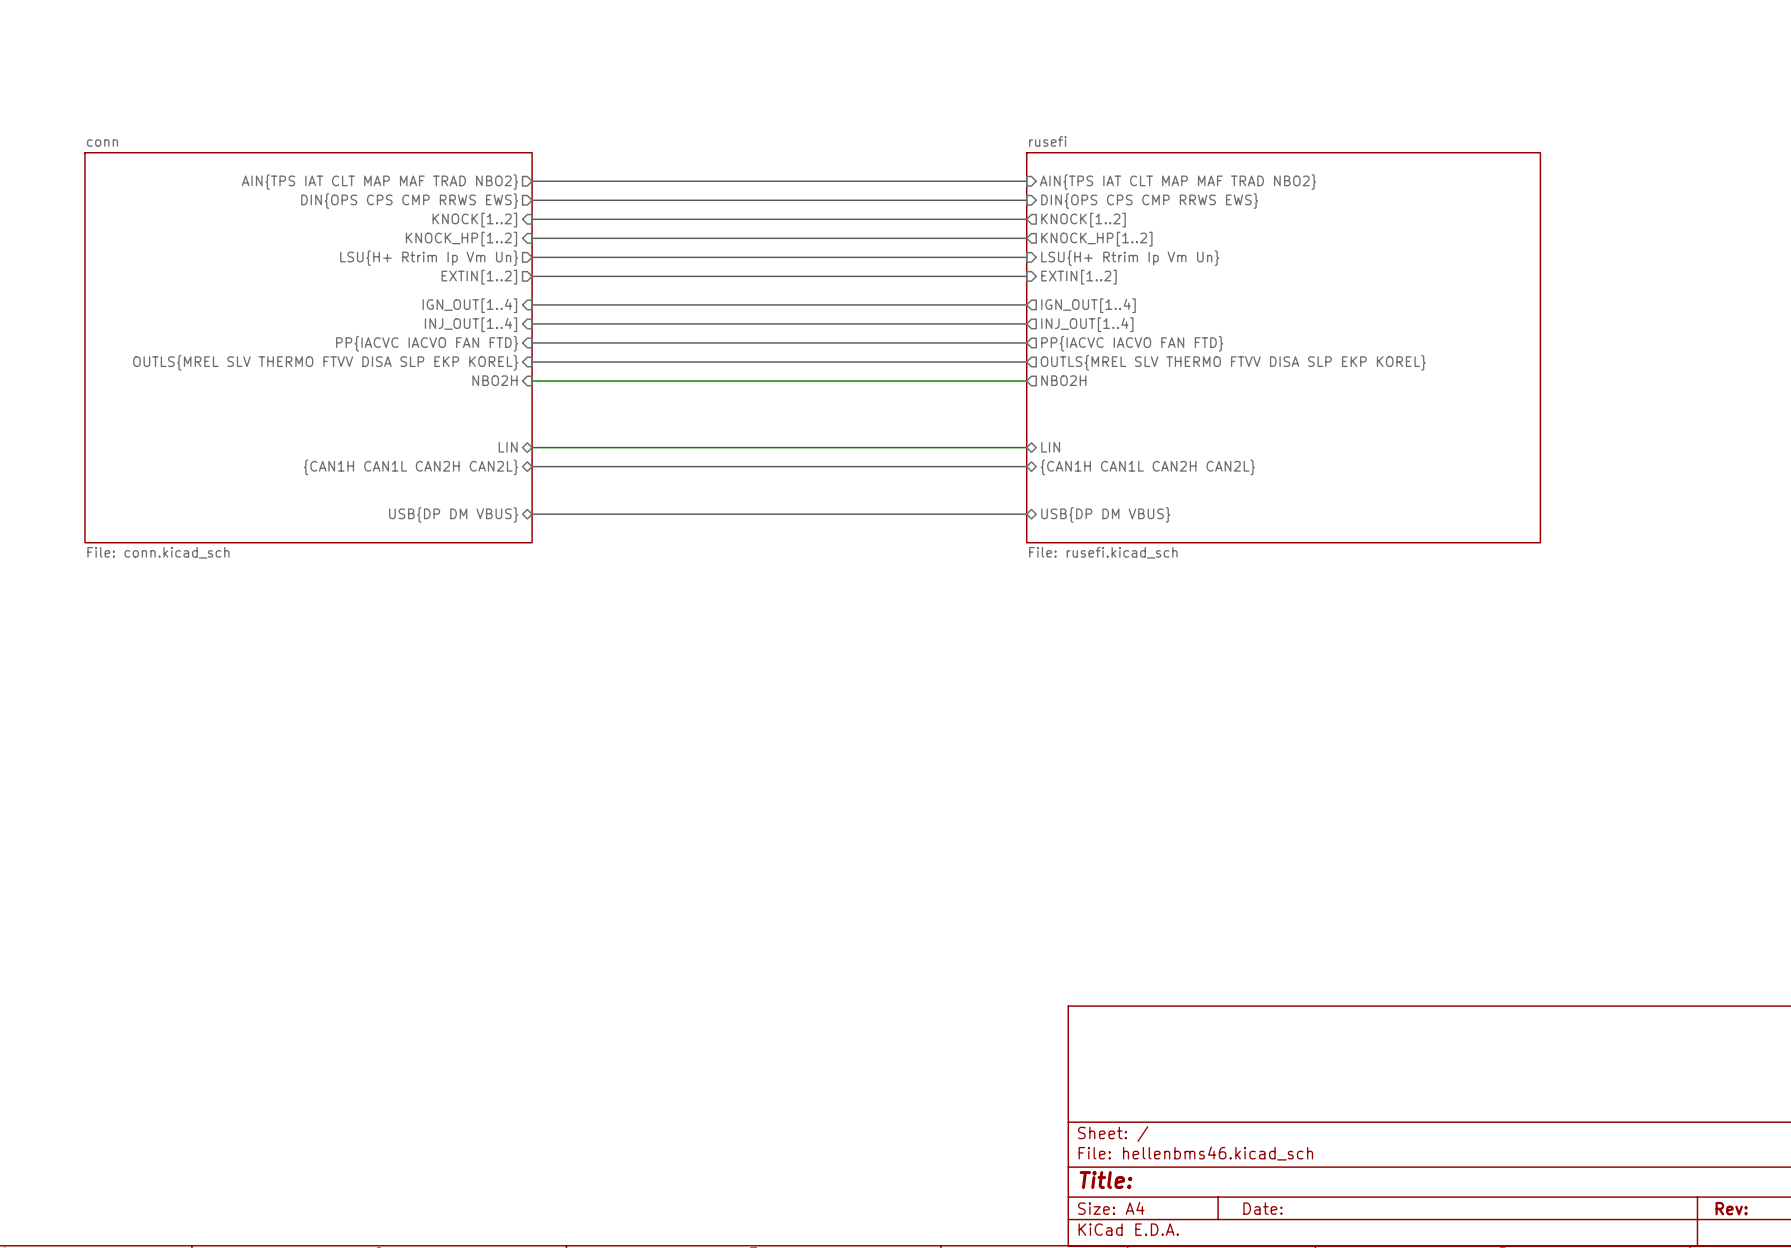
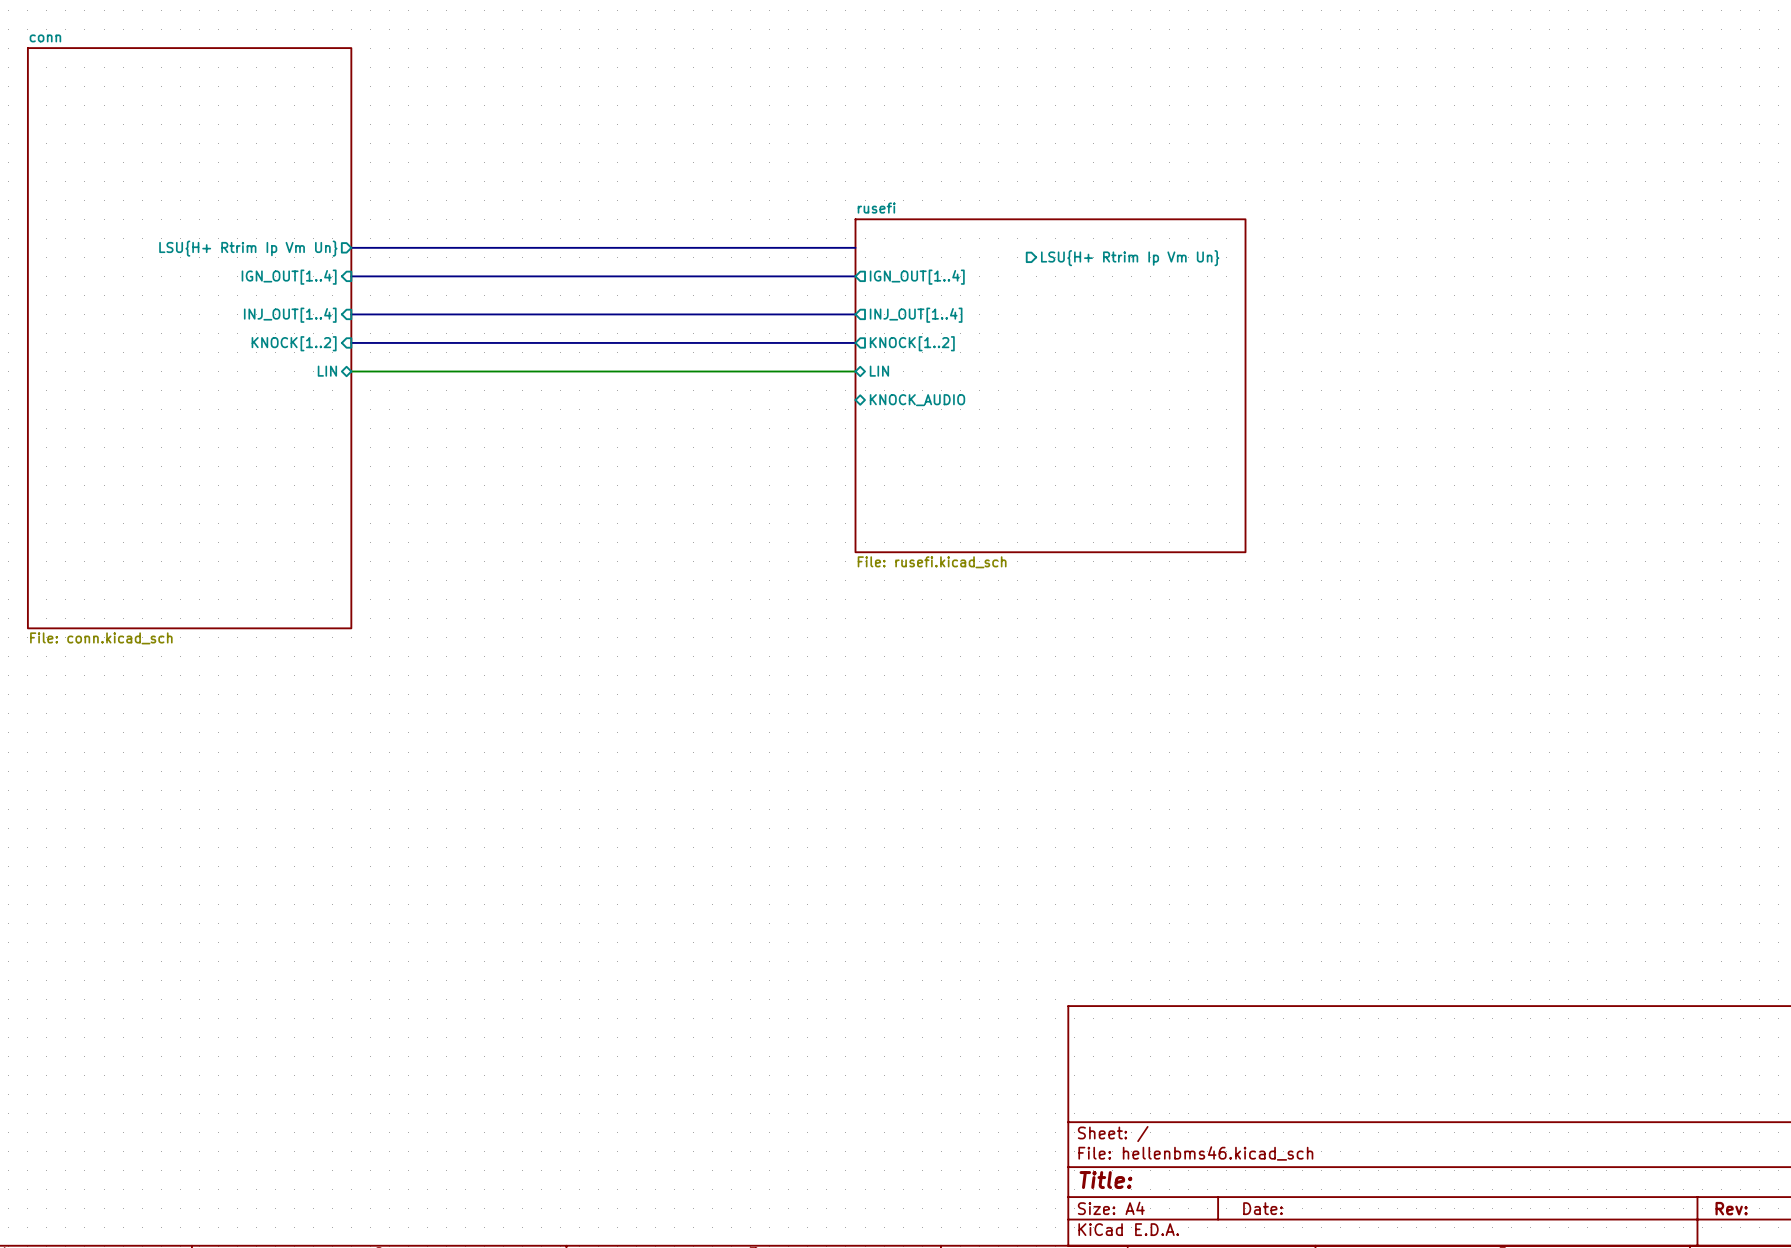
bus: (532, 181) (1026, 181) -> none
sheet pin: AIN{TPS IAT CLT MAP MAF TRAD NBO2} (379, 182) -> none
sheet pin: AIN{TPS IAT CLT MAP MAF TRAD NBO2} (1177, 182) -> none
bus: (532, 200) (1026, 200) -> none
sheet pin: DIN{OPS CPS CMP RRWS EWS} (409, 201) -> none
sheet pin: DIN{OPS CPS CMP RRWS EWS} (1149, 201) -> none
bus: (532, 219) (1026, 219) -> none
sheet pin: KNOCK[1..2] (474, 220) -> none
sheet pin: KNOCK[1..2] (1083, 220) -> none
bus: (532, 238) (1026, 238) -> none
sheet pin: KNOCK_HP[1..2] (461, 239) -> none
sheet pin: KNOCK_HP[1..2] (1096, 239) -> none
bus: none -> (351, 247) (855, 247)
bus: (532, 257) (1026, 257) -> none
sheet pin position: LSU{H+ Rtrim Ip Vm Un} (429, 258) -> LSU{H+ Rtrim Ip Vm Un} (248, 248)
bus: none -> (351, 276) (532, 276)
bus: (855, 276) (1026, 276) -> none
sheet pin: none -> IGN_OUT[1..4] (289, 277)
sheet pin: EXTIN[1..2] (479, 277) -> none
sheet pin: EXTIN[1..2] (1078, 277) -> none
bus: (532, 304) (1026, 304) -> none
sheet pin: IGN_OUT[1..4] (469, 305) -> none
sheet pin position: IGN_OUT[1..4] (1088, 305) -> IGN_OUT[1..4] (917, 277)
bus: none -> (351, 314) (855, 314)
sheet pin: none -> INJ_OUT[1..4] (290, 315)
bus: (532, 323) (1026, 323) -> none
sheet pin: INJ_OUT[1..4] (471, 324) -> none
sheet pin position: INJ_OUT[1..4] (1087, 324) -> INJ_OUT[1..4] (916, 315)
sheet conn: none -> File: conn.kicad_sch (189, 338)
bus: none -> (351, 342) (532, 342)
bus: (855, 342) (1026, 342) -> none
sheet pin: none -> KNOCK[1..2] (294, 343)
sheet pin: PP{IACVC IACVO FAN FTD} (427, 343) -> none
sheet pin: none -> KNOCK[1..2] (912, 343)
sheet pin: PP{IACVC IACVO FAN FTD} (1132, 343) -> none
sheet conn: File: conn.kicad_sch (308, 347) -> none
sheet rusefi: File: rusefi.kicad_sch (1283, 347) -> none
bus: (532, 361) (1026, 361) -> none
sheet pin: OUTLS{MREL SLV THERMO FTVV DISA SLP EKP KOREL} (325, 362) -> none
sheet pin: OUTLS{MREL SLV THERMO FTVV DISA SLP EKP KOREL} (1233, 362) -> none
sheet pin: none -> LIN (327, 371)
wire: none -> (351, 371) (855, 371)
sheet pin: none -> LIN (879, 371)
sheet pin: NBO2H (495, 380) -> none
sheet pin: NBO2H (1063, 380) -> none
wire: (532, 381) (1026, 381) -> none
sheet rusefi: none -> File: rusefi.kicad_sch (1050, 385)
sheet pin: none -> KNOCK_AUDIO (917, 400)
sheet pin: LIN (508, 447) -> none
wire: (532, 447) (1026, 447) -> none
sheet pin: LIN (1050, 447) -> none
bus: (532, 466) (1026, 466) -> none
sheet pin: {CAN1H CAN1L CAN2H CAN2L} (410, 467) -> none
sheet pin: {CAN1H CAN1L CAN2H CAN2L} (1147, 467) -> none
sheet pin: USB{DP DM VBUS} (453, 514) -> none
bus: (532, 514) (1026, 514) -> none
sheet pin: USB{DP DM VBUS} (1105, 514) -> none

